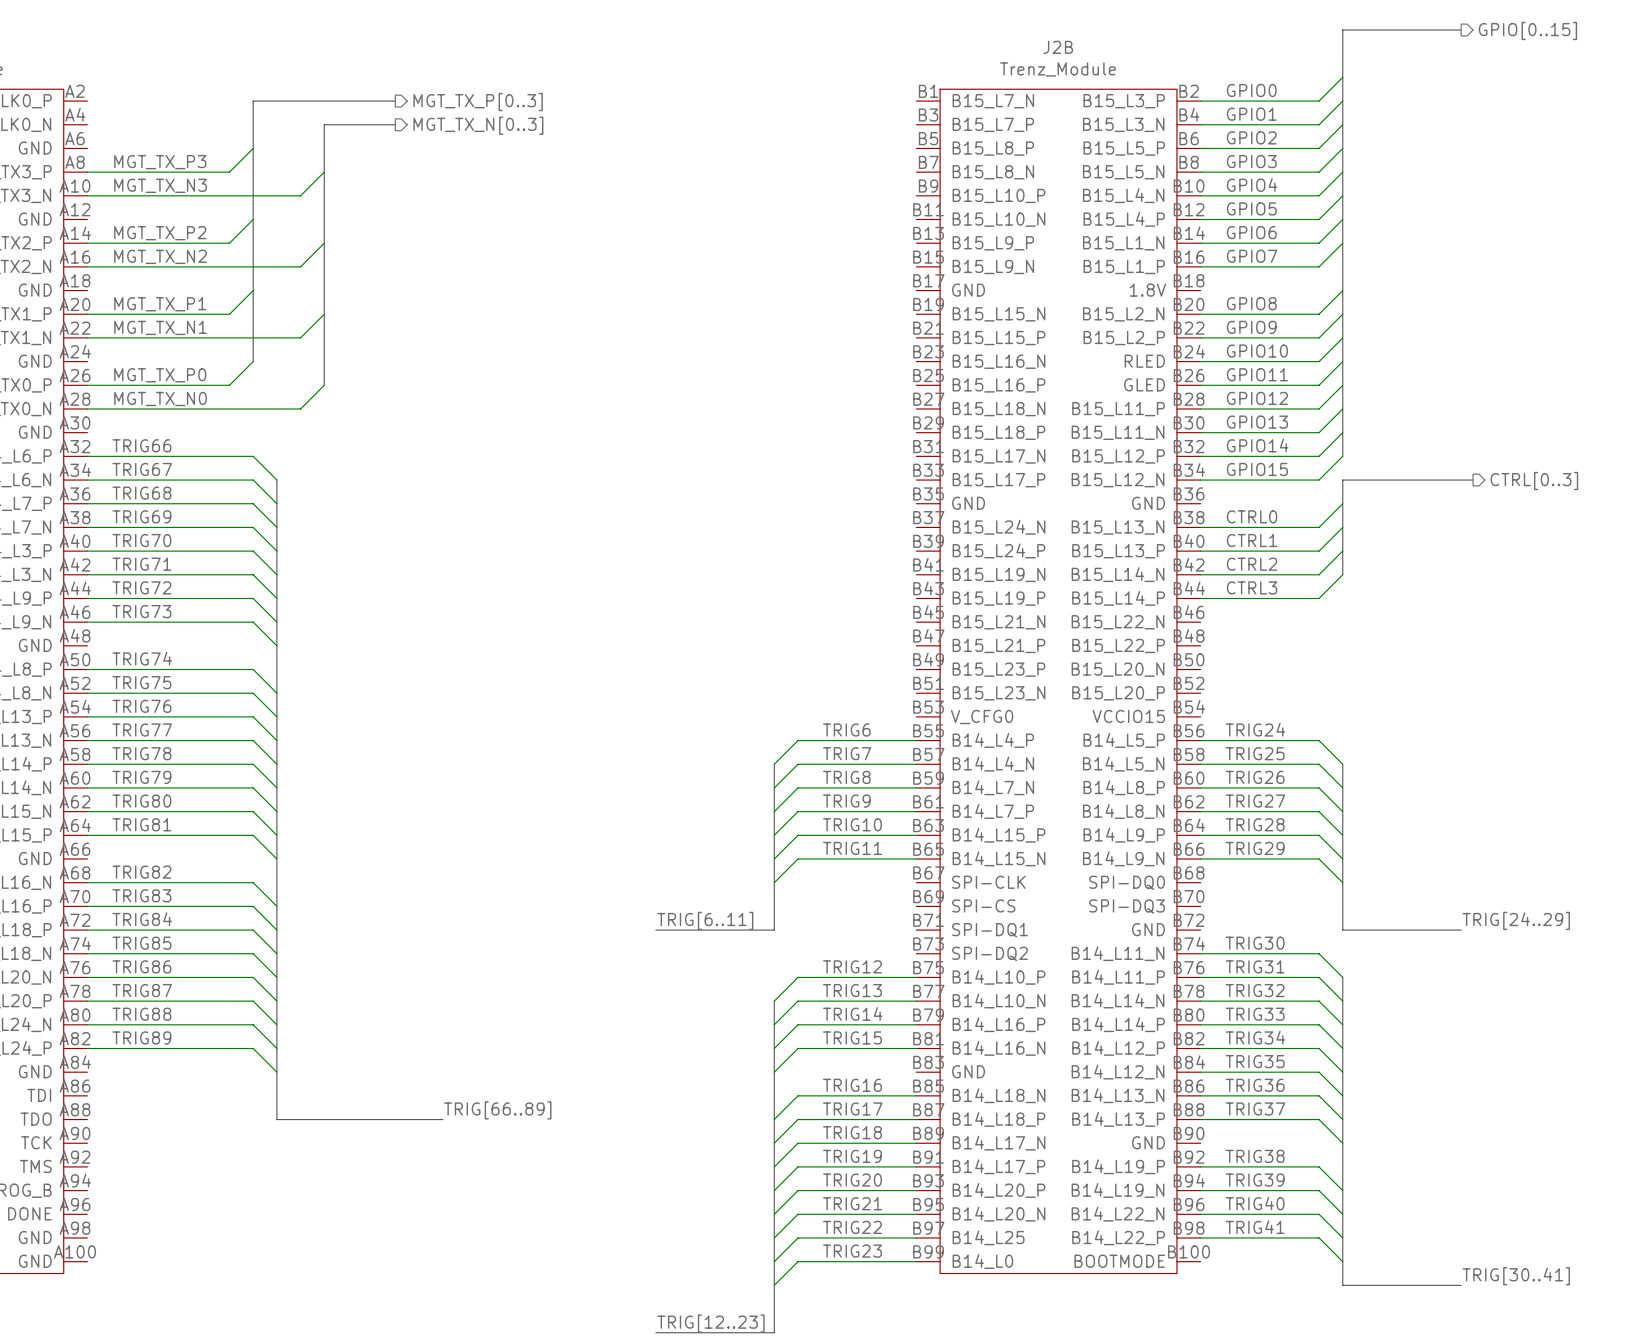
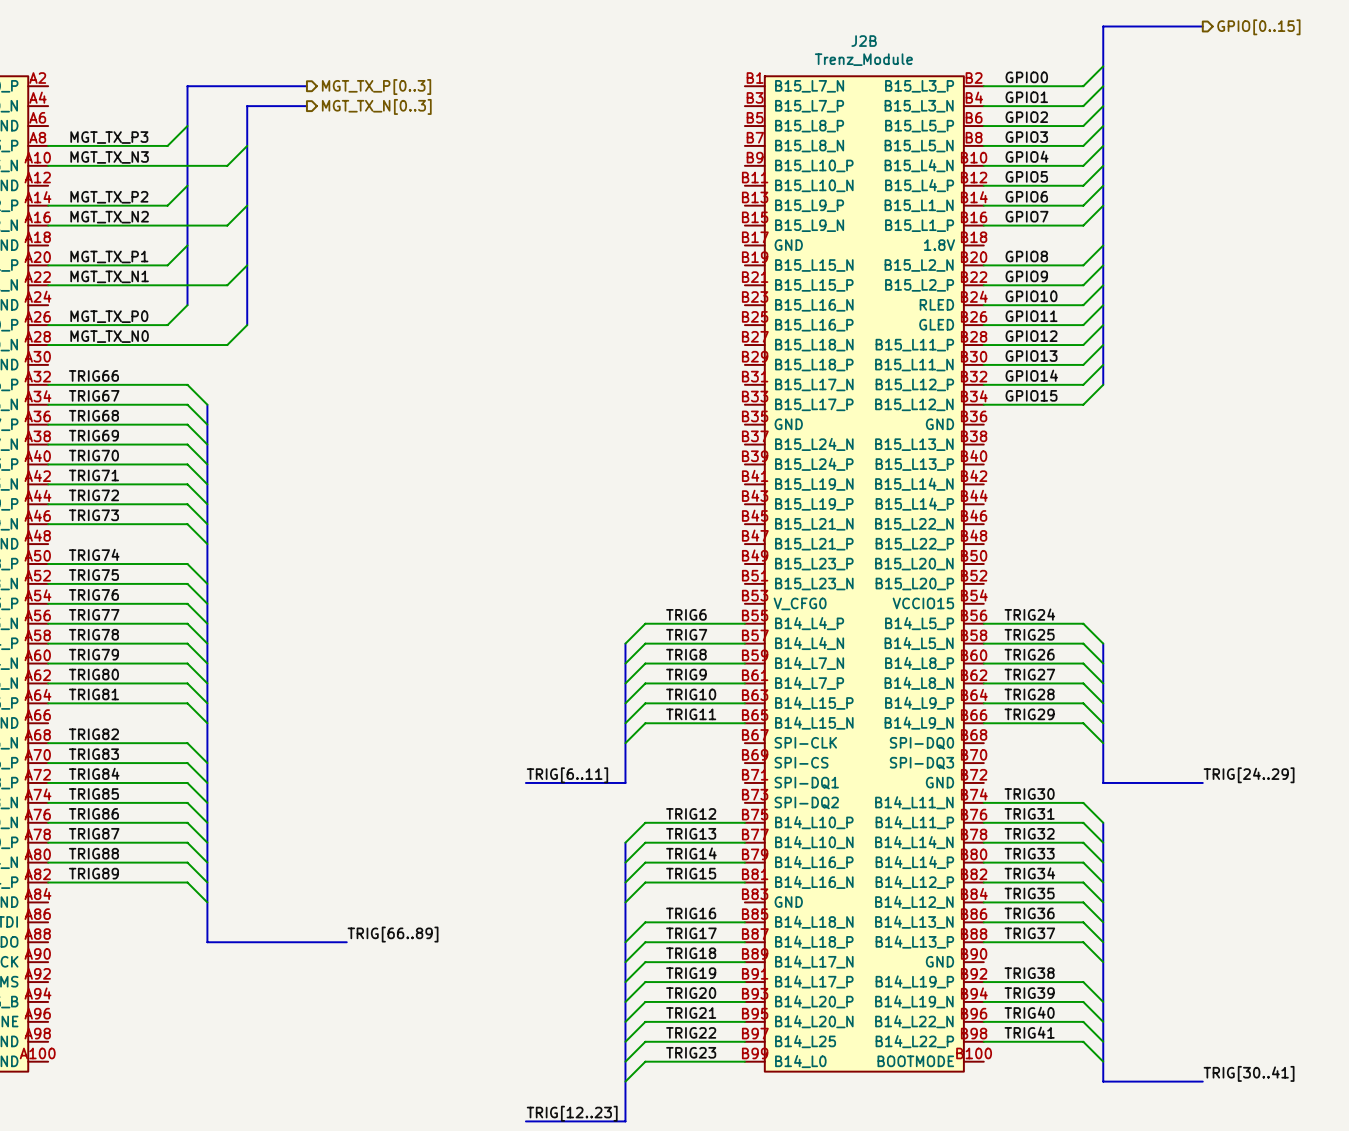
bus: (1473, 480) (1342, 480) (1342, 574) -> none
hierarchical label: CTRL[0..3] (1534, 481) -> none
wire: (1342, 503) (1319, 527) (1200, 527) -> none
label: CTRL0 (1252, 516) -> none
wire: (1342, 527) (1319, 551) (1200, 551) -> none
label: CTRL1 (1252, 540) -> none
wire: (1342, 551) (1319, 574) (1200, 574) -> none
label: CTRL2 (1252, 564) -> none
wire: (1342, 574) (1319, 598) (1200, 598) -> none
label: CTRL3 (1252, 587) -> none

